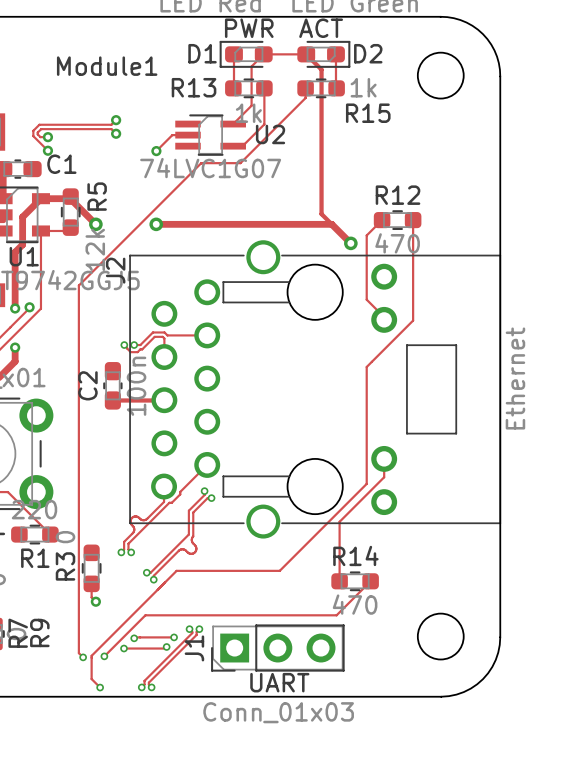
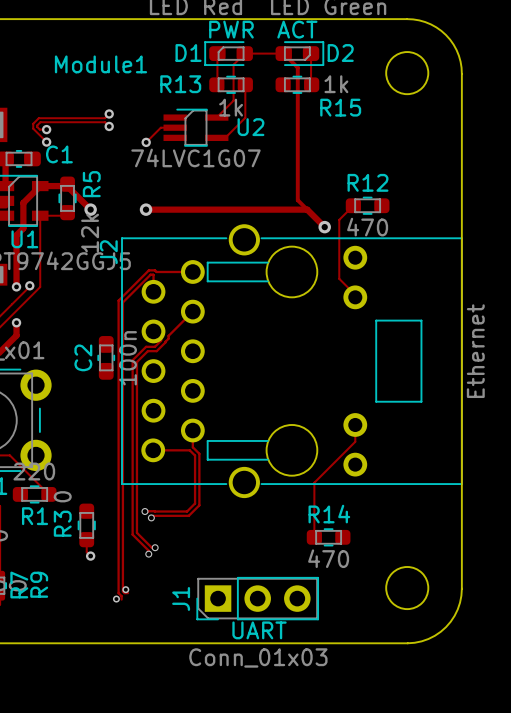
track: (305, 88) (305, 98) (240, 163) (201, 163) (78, 285) (78, 653) (83, 657) -> none
track: (413, 220) (413, 320) (366, 366) (366, 483) (279, 570) (176, 570) (91, 655) (91, 679) (100, 687) -> none
track: none -> (192, 271) (148, 270) (118, 300) (118, 593) (121, 599)
track: none -> (153, 291) (153, 275) (150, 274) (122, 302) (122, 591) (128, 593)
track: (207, 335) (167, 335) (164, 332) (152, 332) (140, 345) (134, 345) -> (192, 311) (168, 335) (168, 338) (156, 351) (147, 351) (136, 362) (136, 532) (151, 547) (155, 547)
track: (124, 345) (130, 352) (137, 352) (154, 336) (162, 336) (164, 338) (164, 357) -> (148, 554) (148, 550) (132, 534) (132, 360) (146, 346) (154, 346) (161, 340) (153, 331)
via: (124, 345) -> none
via: (134, 345) -> none
track: (112, 400) (164, 400) -> none
track: (207, 464) (171, 502) (169, 502) (128, 543) (128, 549) (131, 552) -> (192, 430) (192, 447) (199, 453) (199, 505) (188, 515) (153, 515) (151, 517)
track: (164, 486) (164, 501) (147, 518) (143, 520) (135, 516) (131, 518) (134, 531) (124, 541) (124, 549) (121, 552) -> (153, 450) (189, 450) (195, 455) (195, 503) (187, 511) (144, 511)
track: (204, 491) (204, 495) (188, 510) (188, 534) (150, 572) (146, 572) -> none
via: (204, 491) -> none
track: (211, 498) (207, 498) (193, 512) (191, 540) (196, 547) (195, 551) (190, 553) (184, 549) (179, 550) (153, 575) (153, 579) -> none
via: (211, 498) -> none
via: (121, 552) -> none
via: (131, 552) -> none
via: none -> (144, 511)
via: none -> (151, 517)
via: (146, 572) -> none
via: (153, 579) -> none
track: (370, 581) (336, 615) (145, 615) (104, 656) -> none
via: none -> (155, 547)
via: none -> (148, 554)
track: (189, 629) (192, 633) (144, 680) (141, 687) -> none
via: (189, 629) -> none
track: (199, 629) (196, 634) (148, 682) (151, 687) -> none
via: (199, 629) -> none
track: (174, 637) (134, 638) -> none
via: (174, 637) -> none
track: (166, 646) (166, 648) (124, 648) -> none
via: (166, 646) -> none
via: (104, 656) -> none
via: (83, 657) -> none
via: (100, 687) -> none
via: (141, 687) -> none
via: (151, 687) -> none

